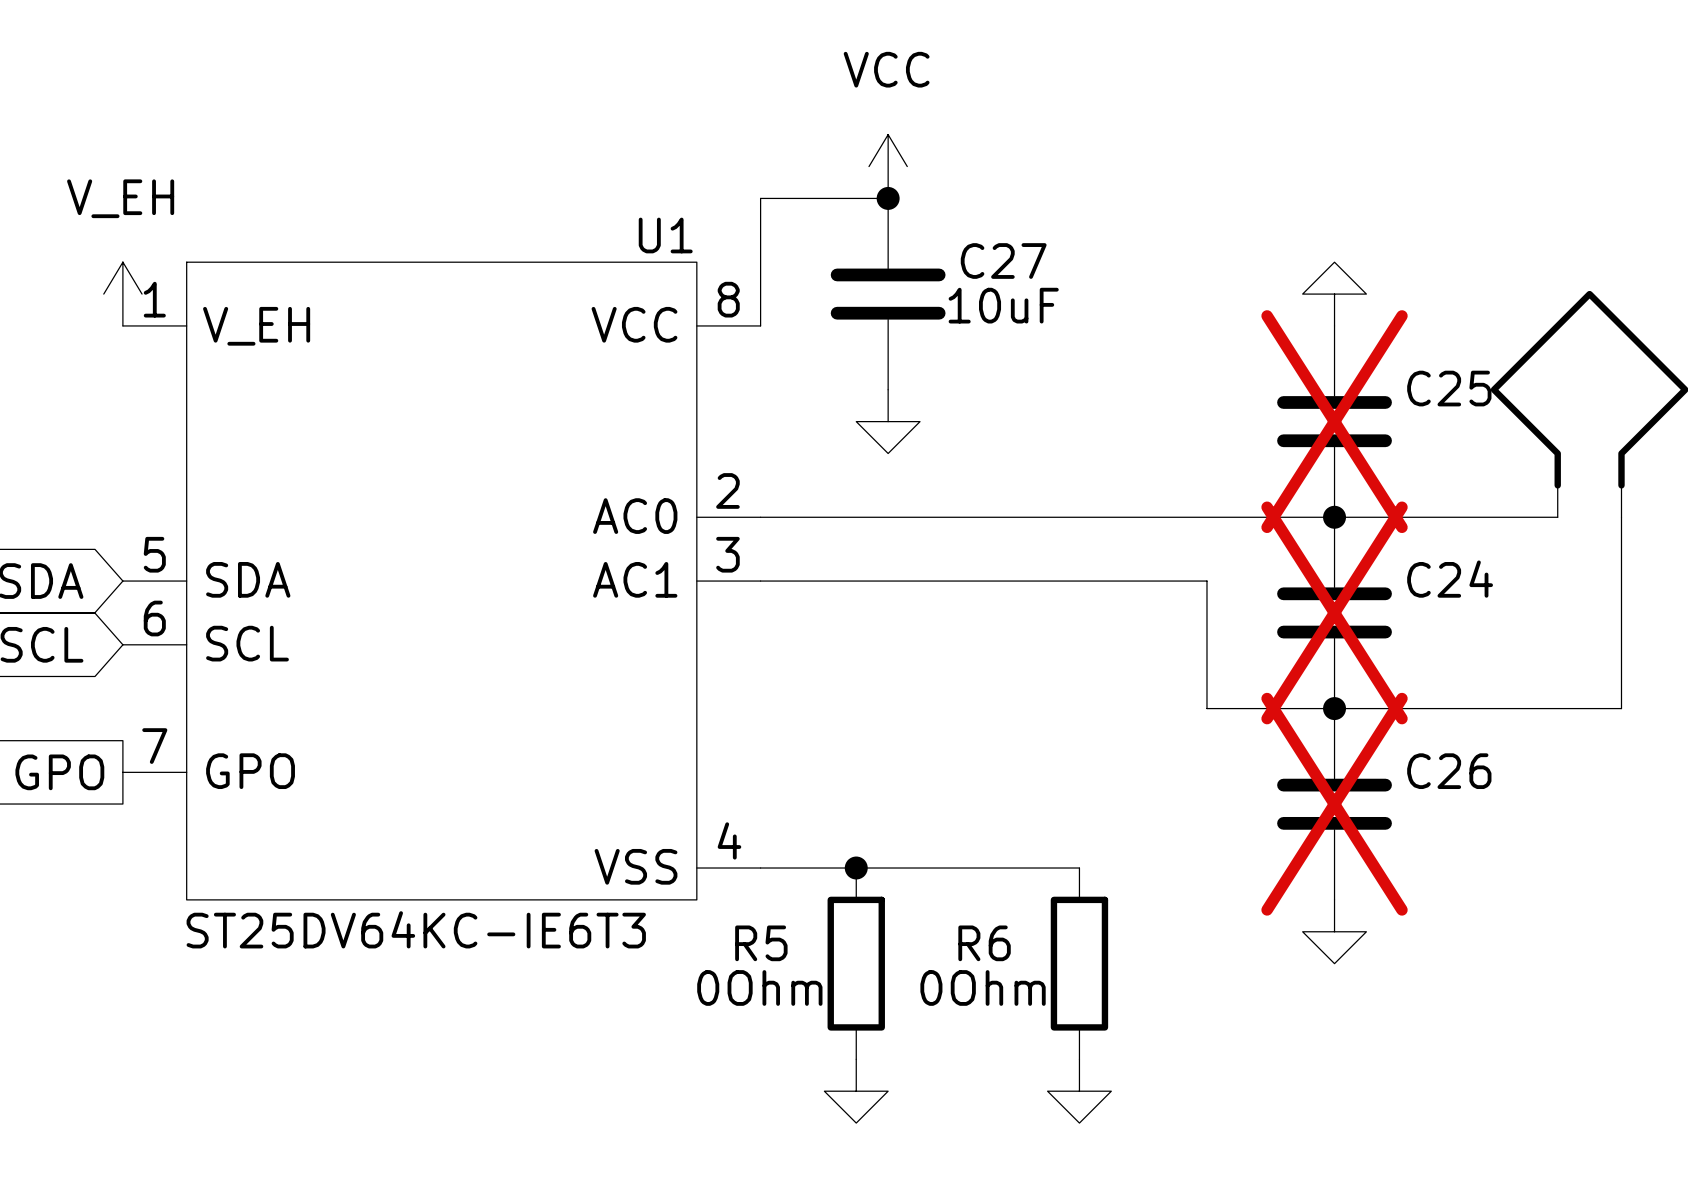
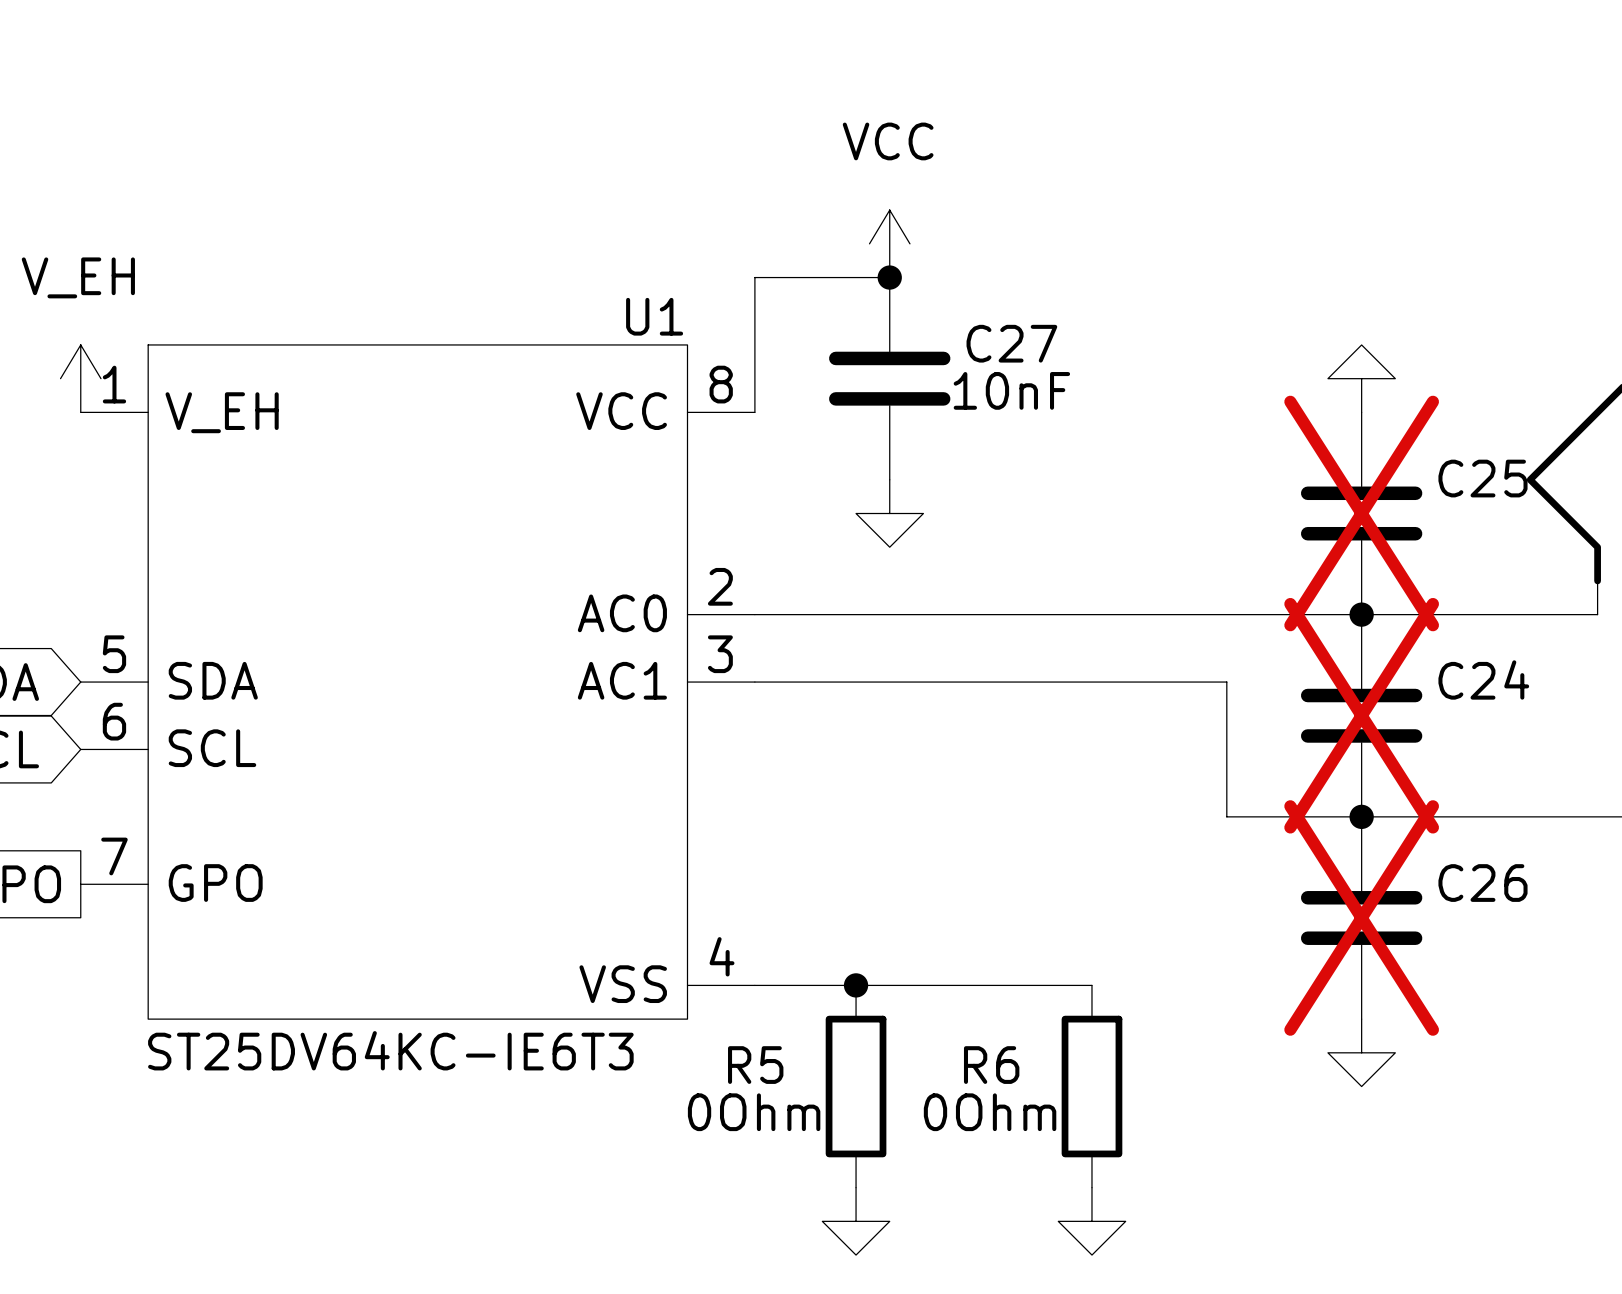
C27 value: 10uF (1003, 305) -> 10nF (1011, 390)

